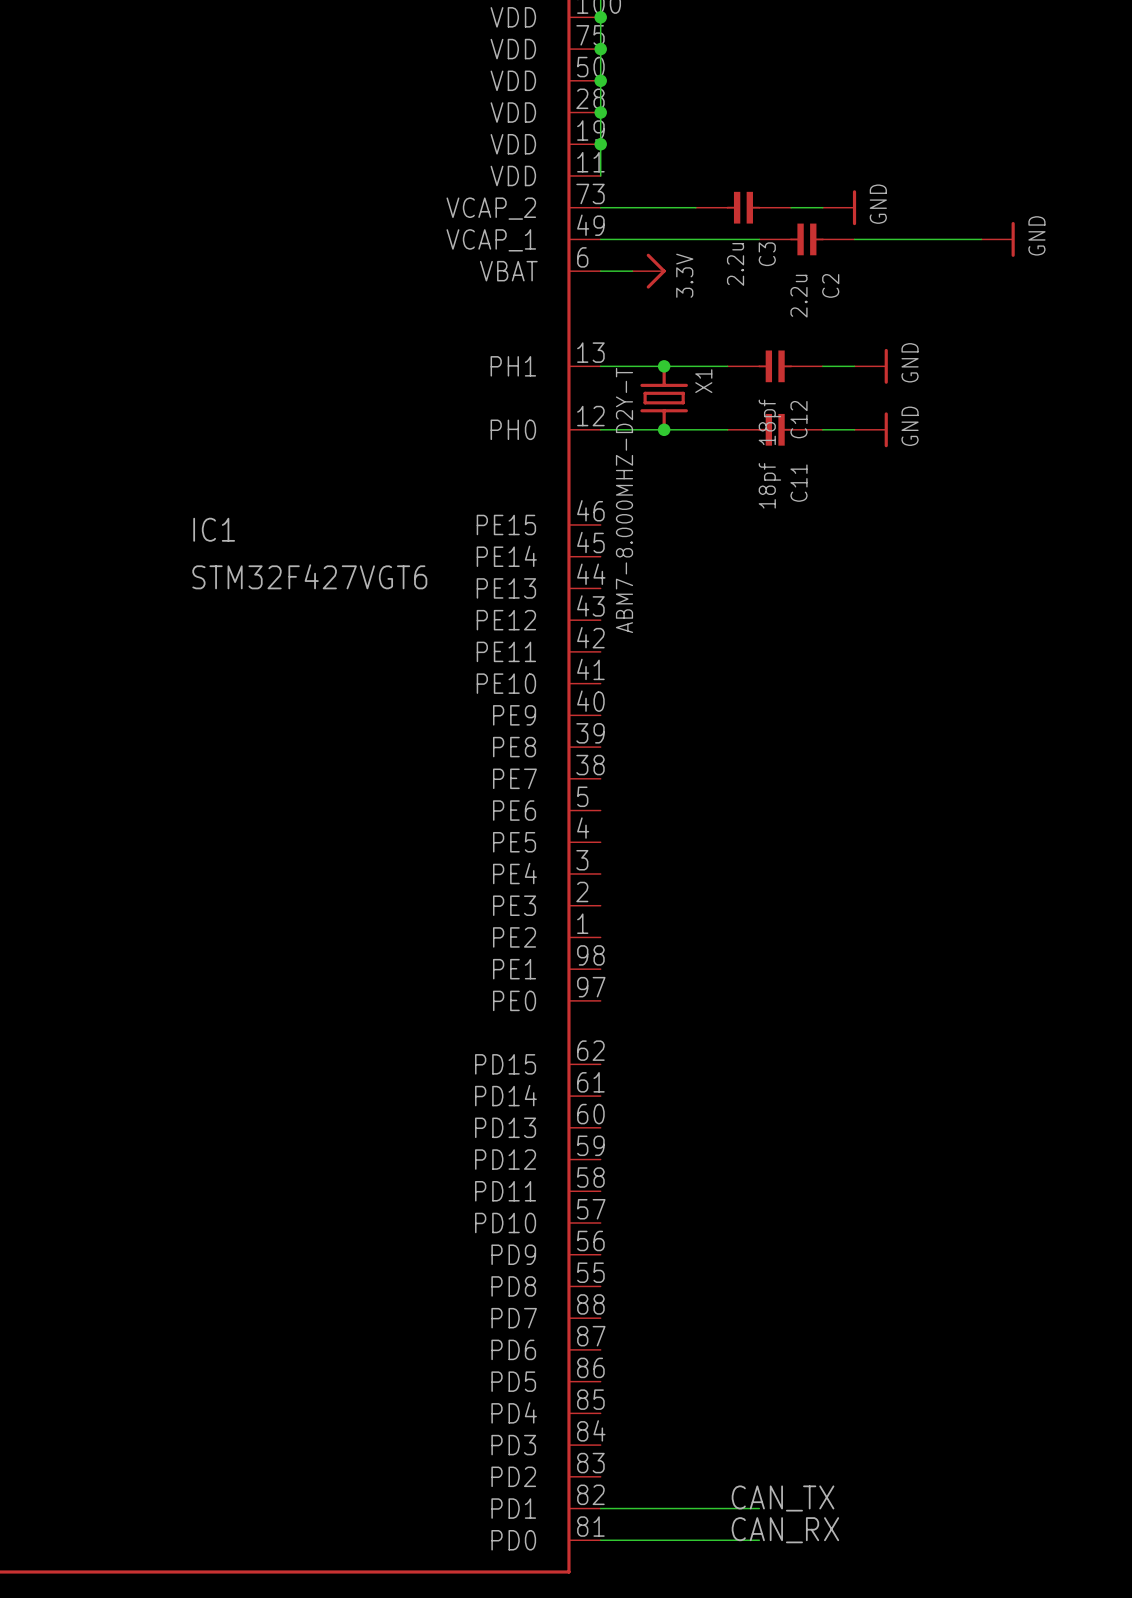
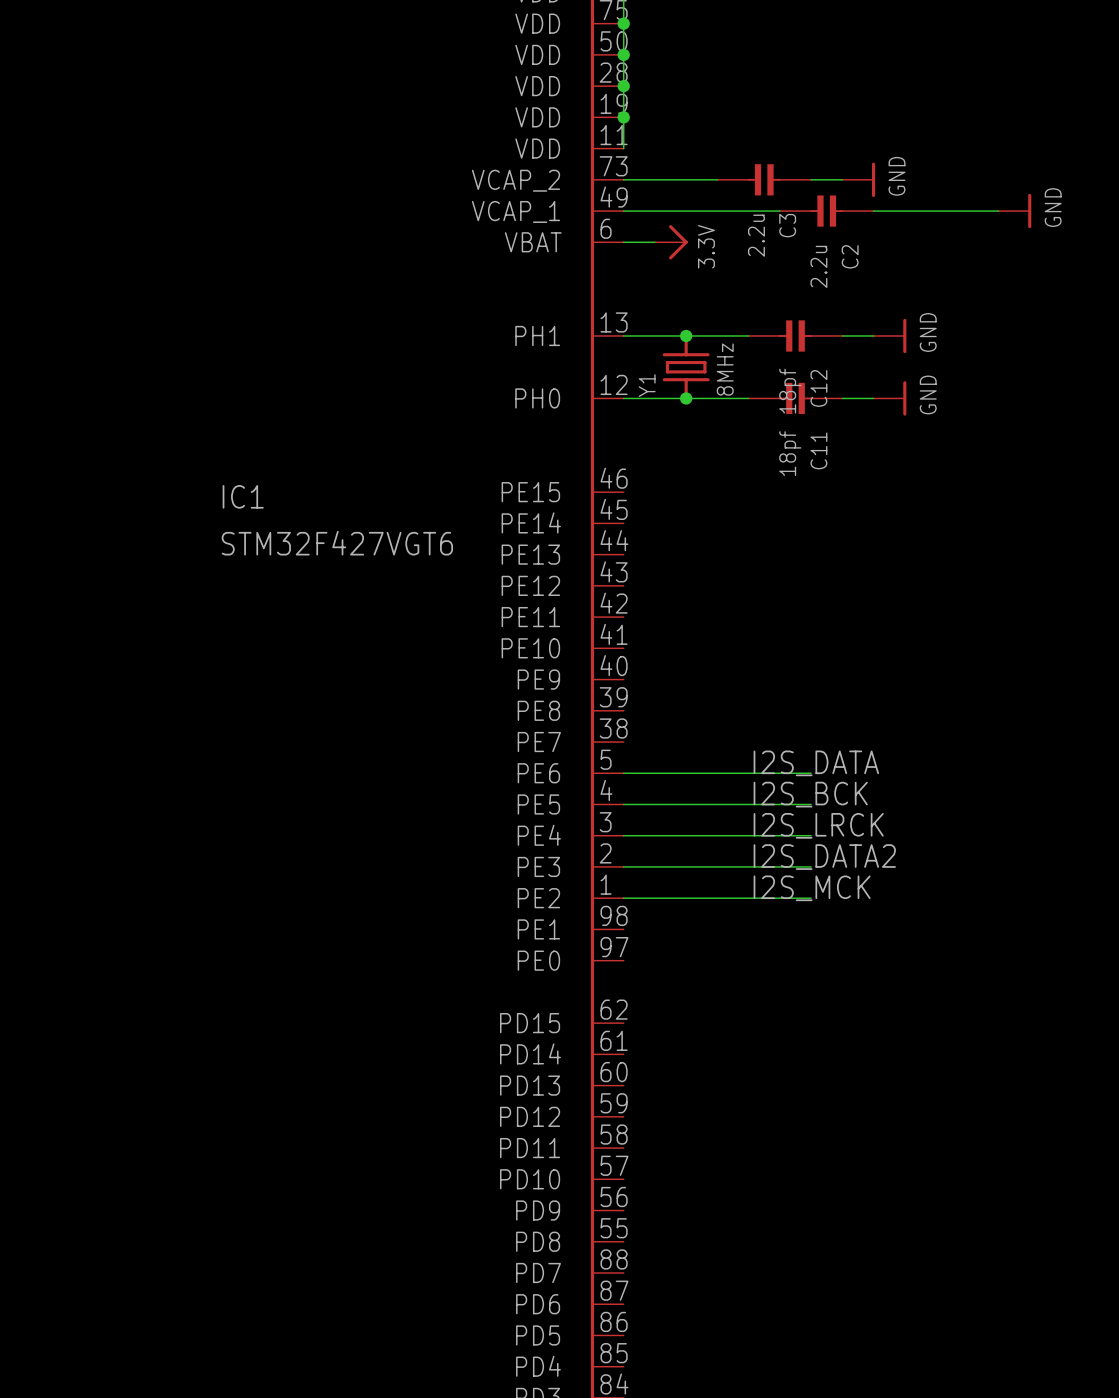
X1 name: X1 (703, 381) -> Y1 (647, 385)
X1 value: ABM7-8.000MHZ-D2Y-T (624, 500) -> 8MHz (725, 369)
label: none -> I2S_DATA (816, 763)
wire: none -> (623, 773) (811, 773)
label: none -> I2S_BCK (810, 794)
wire: none -> (623, 804) (811, 804)
label: none -> I2S_LRCK (818, 825)
wire: none -> (623, 835) (811, 835)
label: none -> I2S_DATA2 (824, 857)
wire: none -> (623, 866) (811, 866)
label: none -> I2S_MCK (812, 888)
wire: none -> (623, 898) (811, 898)

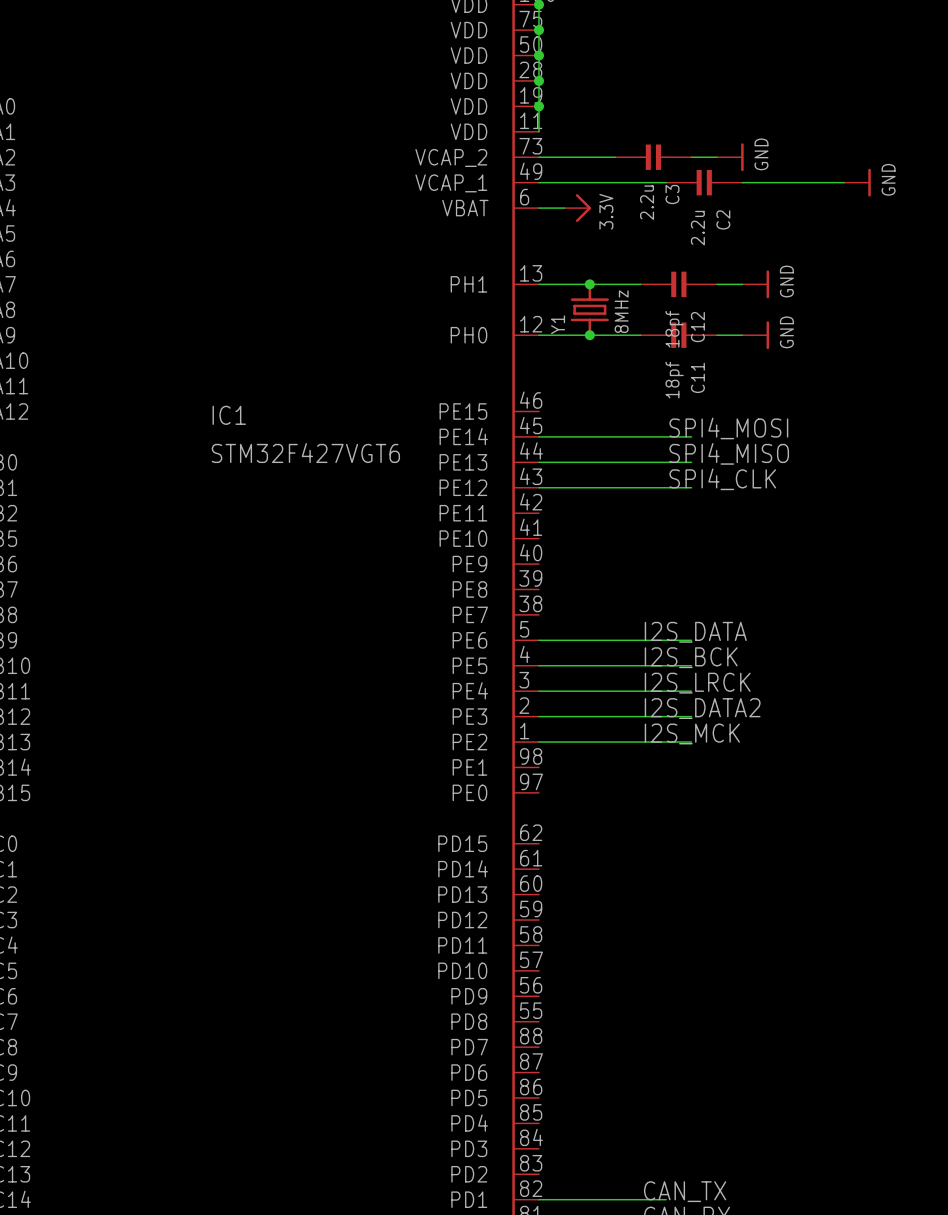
label: none -> SPI4_MOSI (728, 428)
wire: none -> (538, 436) (691, 436)
label: none -> SPI4_MISO (729, 453)
wire: none -> (538, 462) (691, 462)
label: none -> SPI4_CLK (722, 479)
wire: none -> (538, 487) (691, 487)

